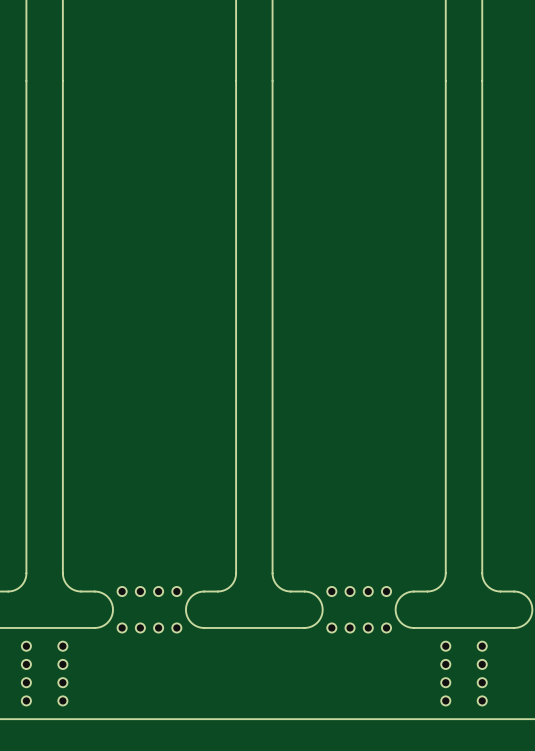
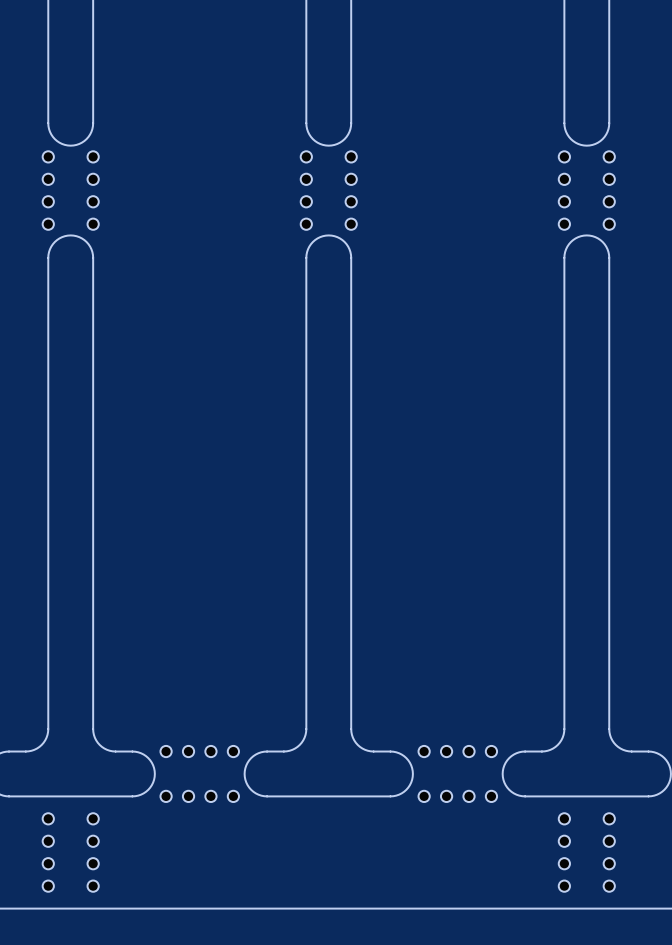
board edge: (26, 80) (26, 190) -> (48, 123) (49, 131) (54, 139) (62, 143) (70, 145) (79, 143) (86, 139) (91, 131) (93, 123)
board edge: (62, 80) (62, 190) -> (48, 257) (49, 249) (54, 241) (62, 237) (70, 235) (79, 237) (86, 241) (91, 249) (93, 257)
board edge: (236, 80) (236, 190) -> (306, 123) (308, 131) (312, 139) (320, 143) (328, 145) (337, 143) (344, 139) (349, 131) (351, 123)
board edge: (272, 80) (272, 190) -> (306, 257) (308, 249) (312, 241) (320, 237) (328, 235) (337, 237) (344, 241) (349, 249) (351, 257)
board edge: (445, 80) (445, 190) -> (564, 123) (566, 131) (570, 139) (578, 143) (586, 145) (595, 143) (602, 139) (607, 131) (609, 123)
board edge: (482, 80) (482, 190) -> (564, 257) (566, 249) (570, 241) (578, 237) (586, 235) (595, 237) (602, 241) (607, 249) (609, 257)
part: none -> (70, 190)
part: none -> (328, 190)
part: none -> (586, 190)

